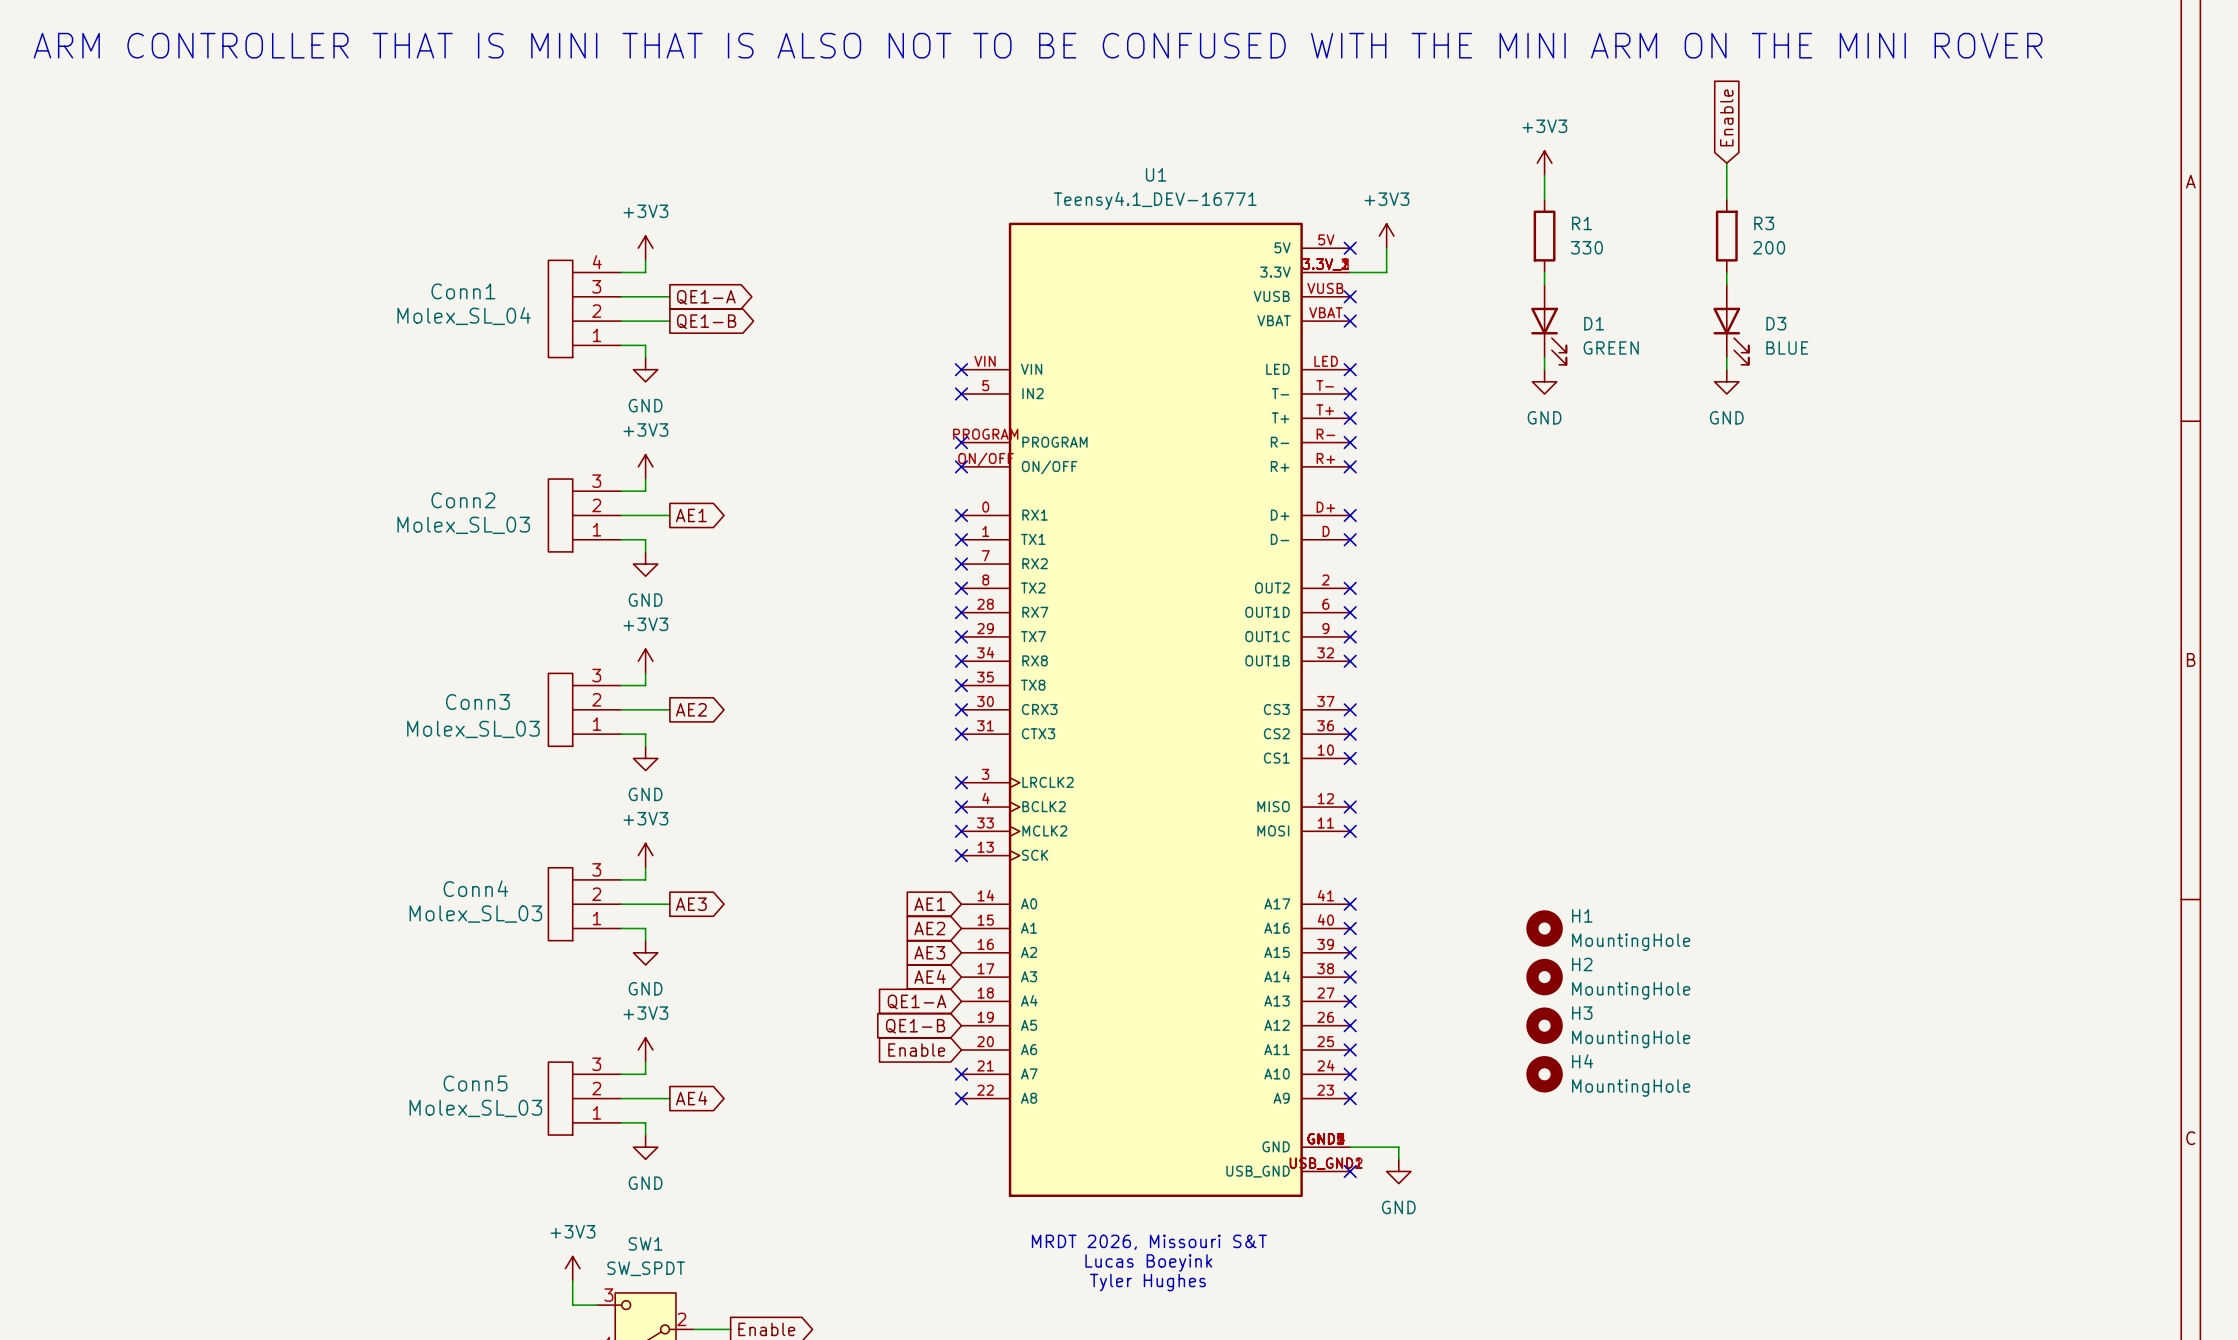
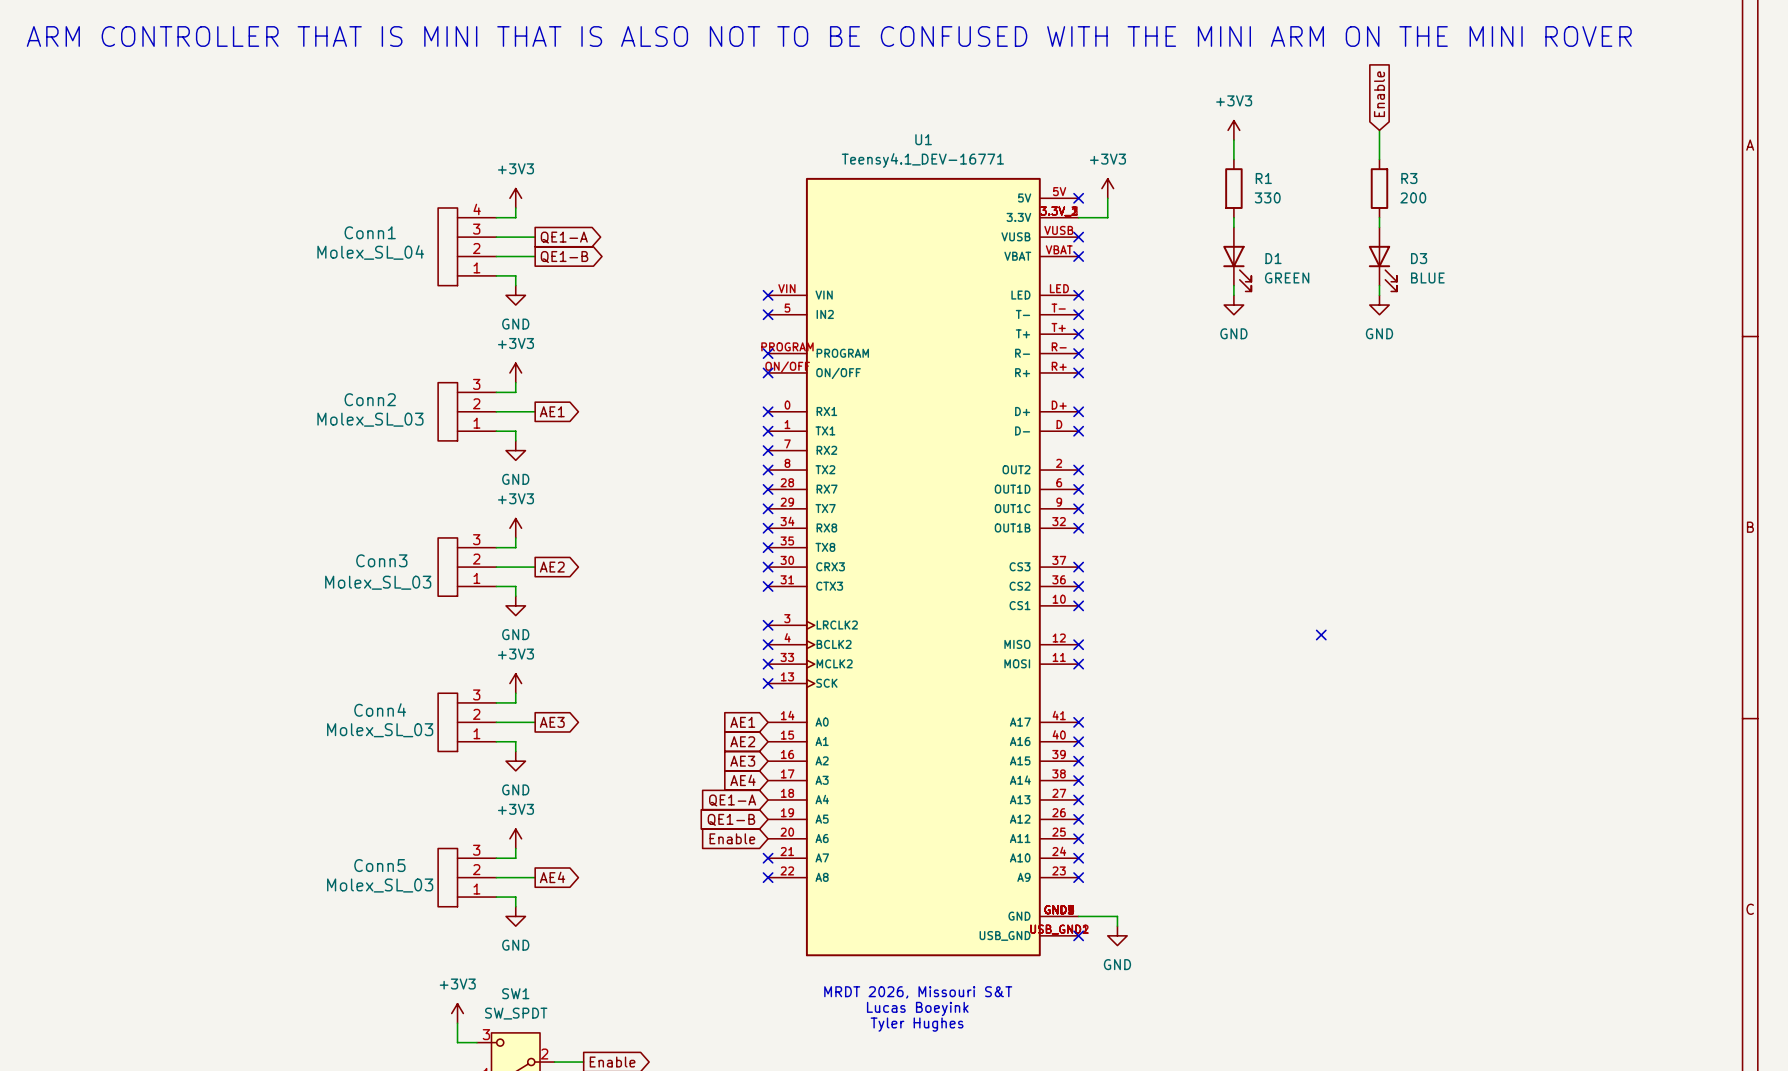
no-connect mark: none -> (1321, 635)
H1: MountingHole (1544, 928) -> none
H2: MountingHole (1544, 977) -> none
H3: MountingHole (1544, 1025) -> none
H4: MountingHole (1544, 1074) -> none

